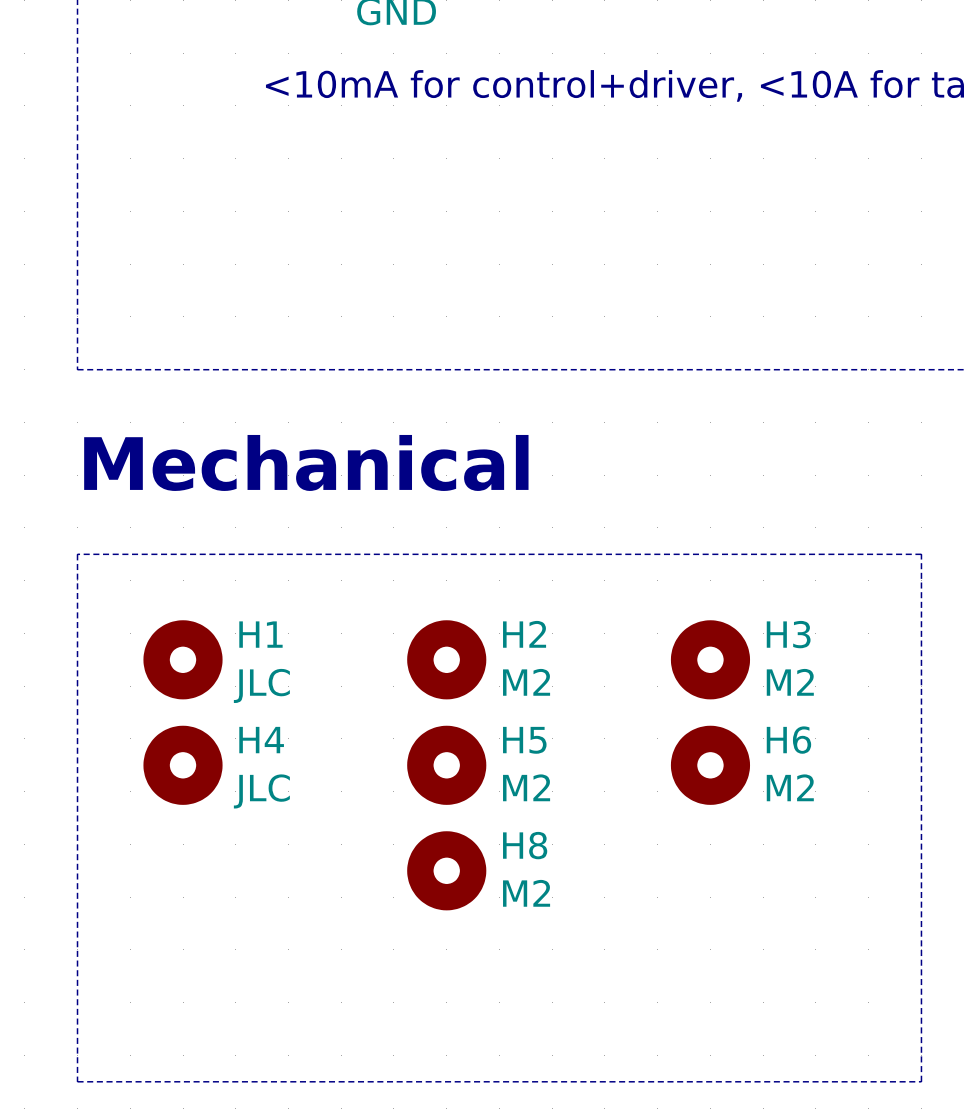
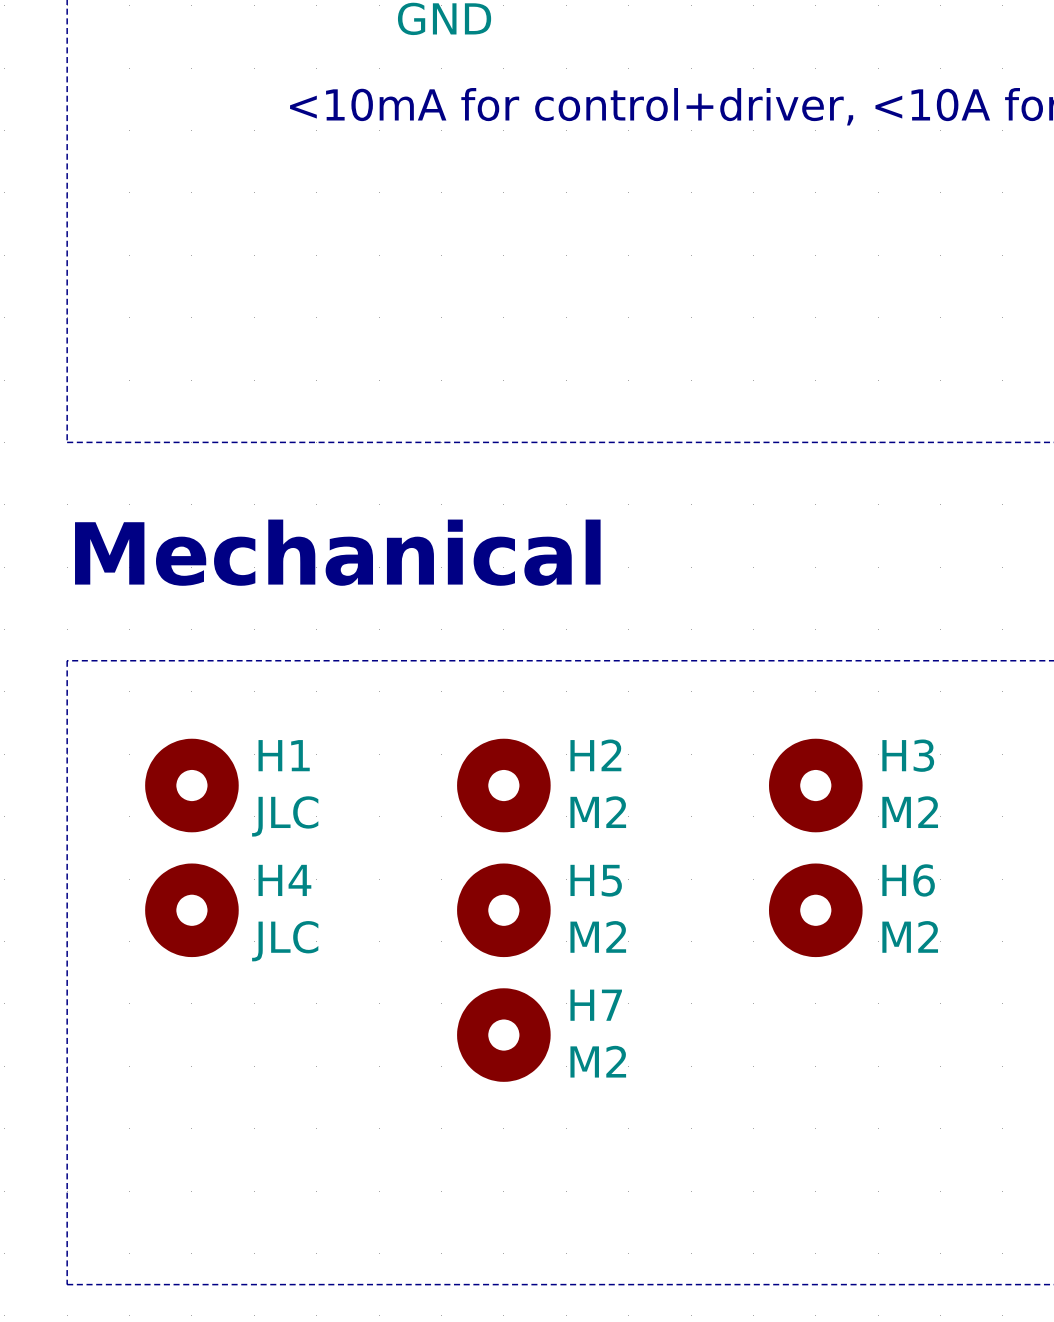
H8 name: H8 (525, 845) -> H7 (596, 1005)

